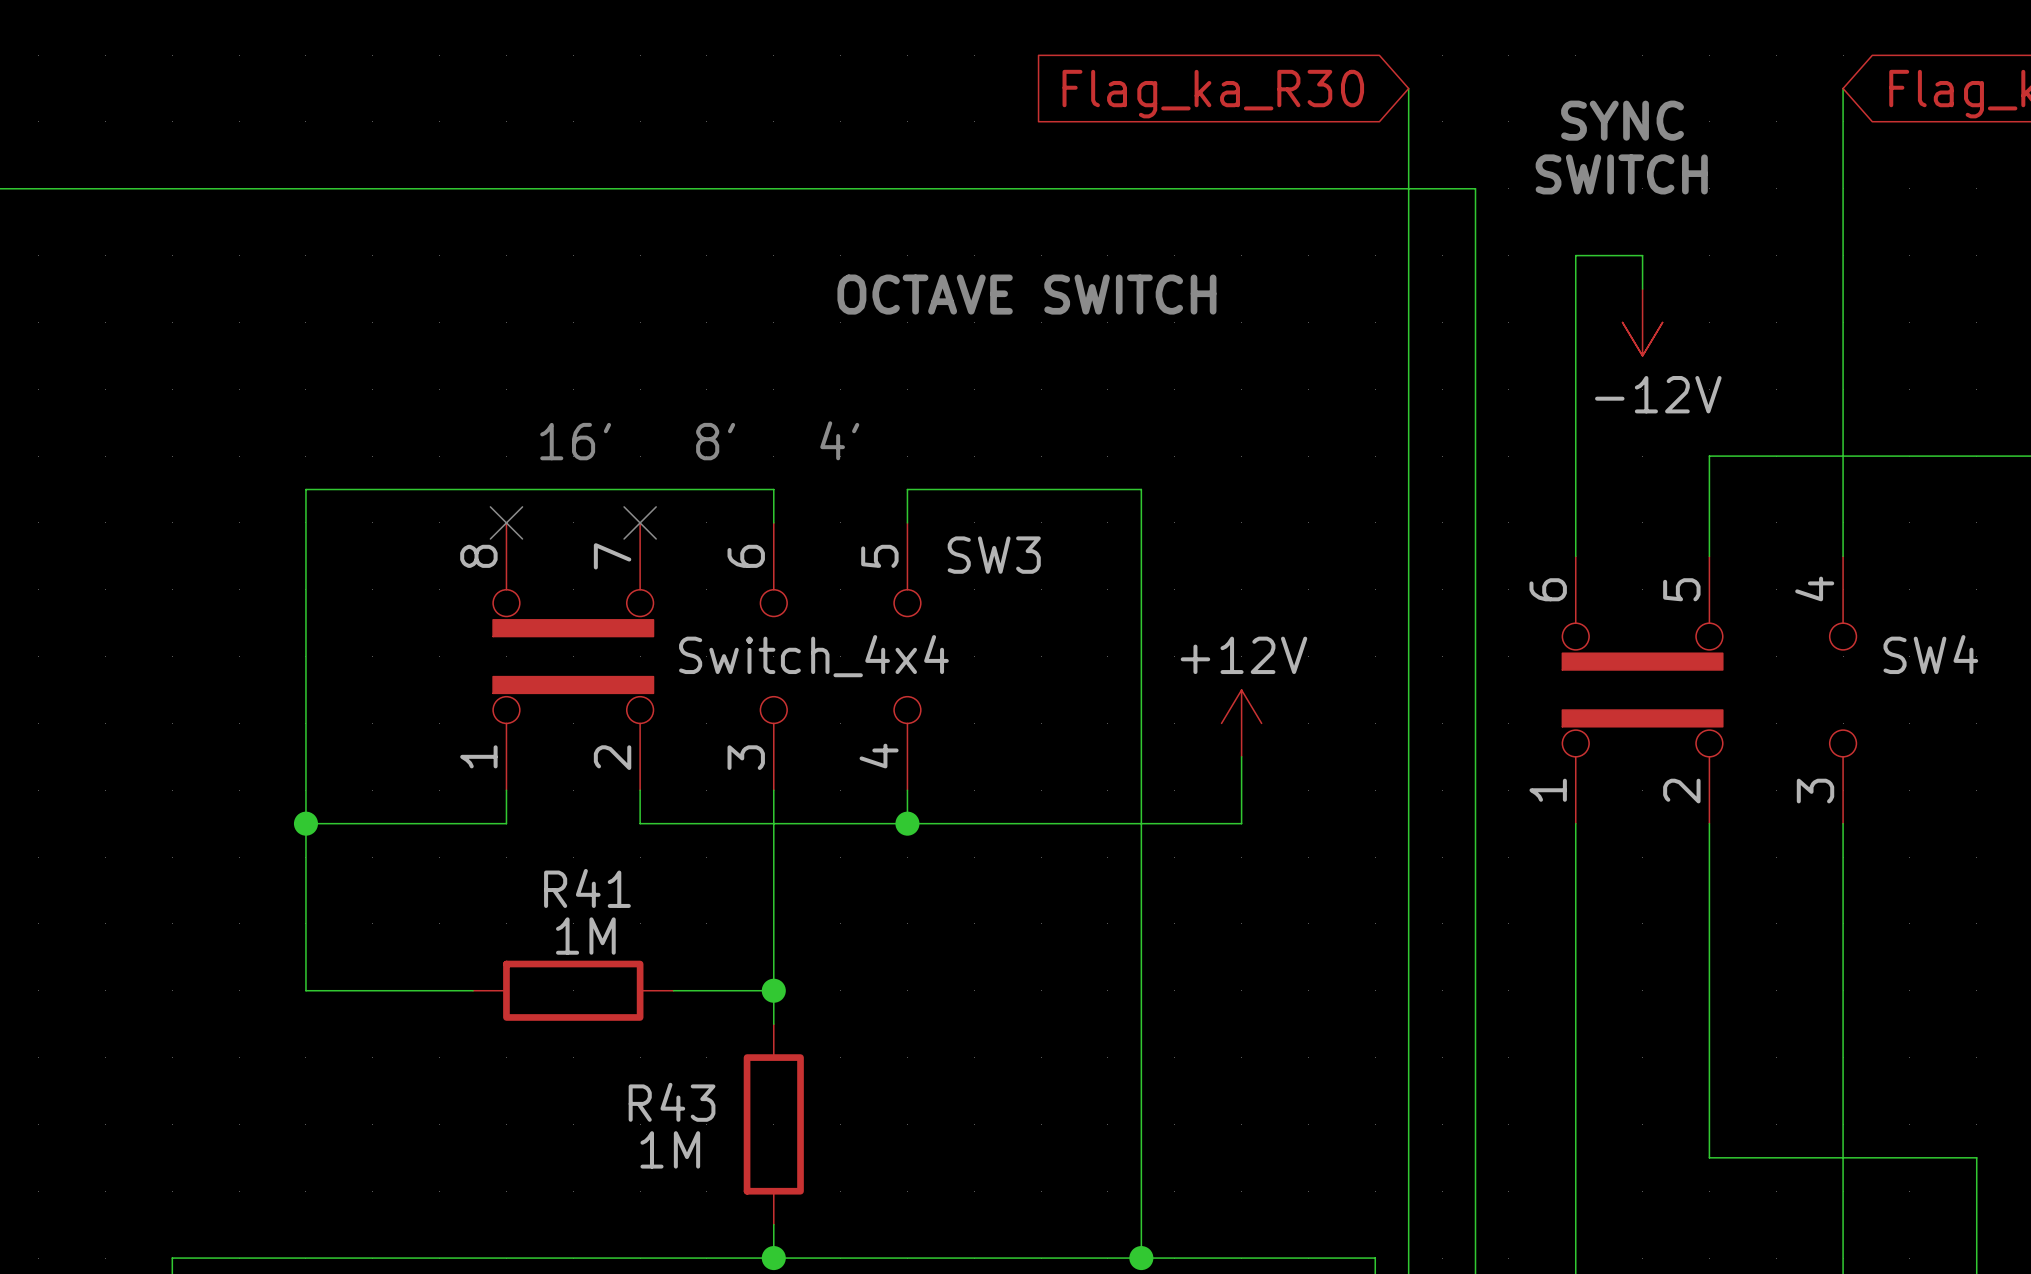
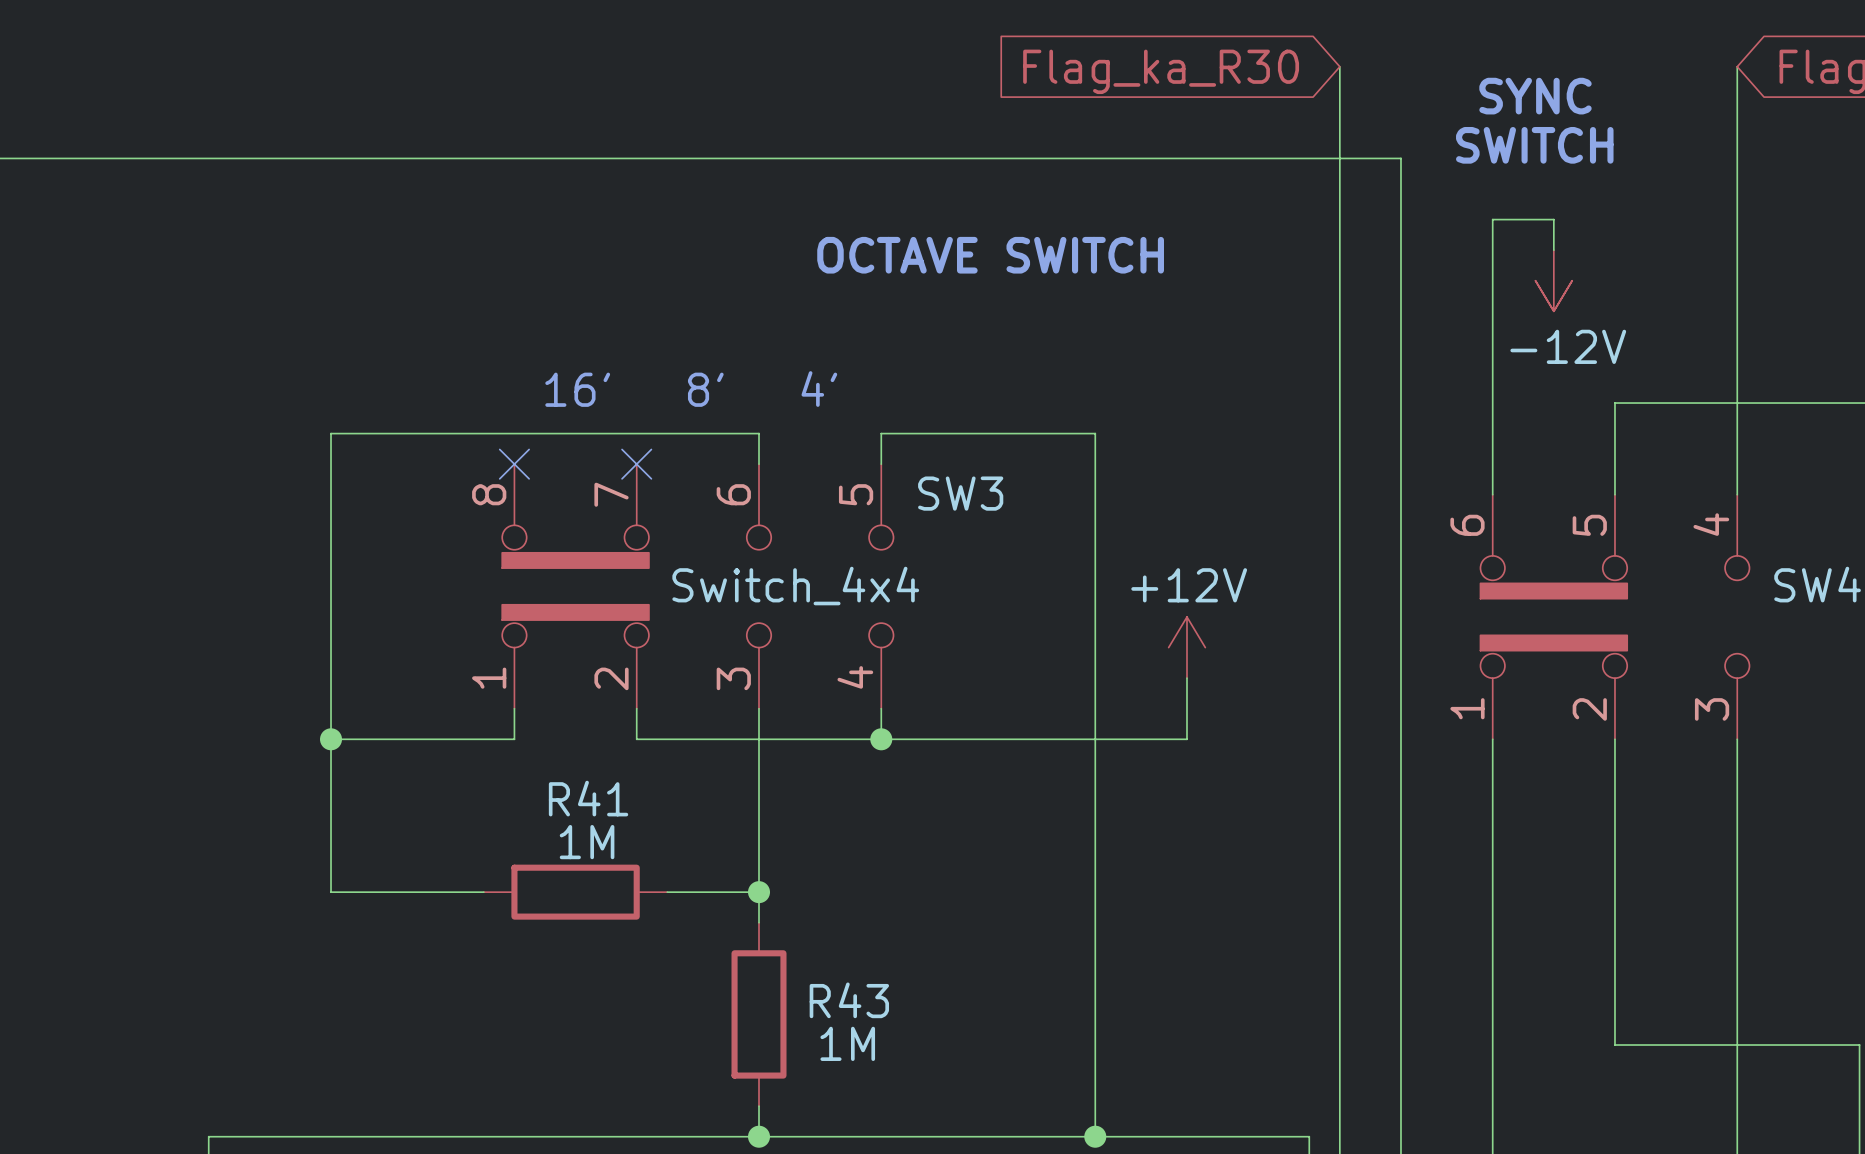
R43 name position: R43 (672, 1102) -> R43 (849, 1000)
R43 value position: 1M (670, 1149) -> 1M (847, 1043)

